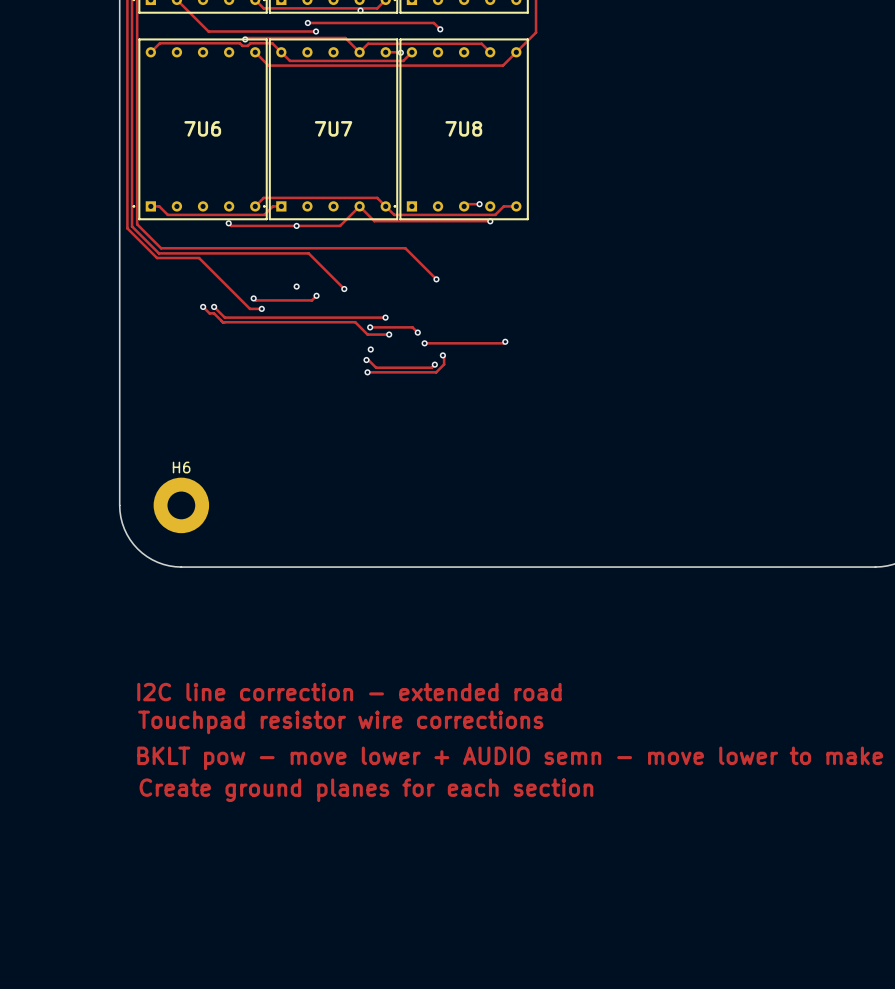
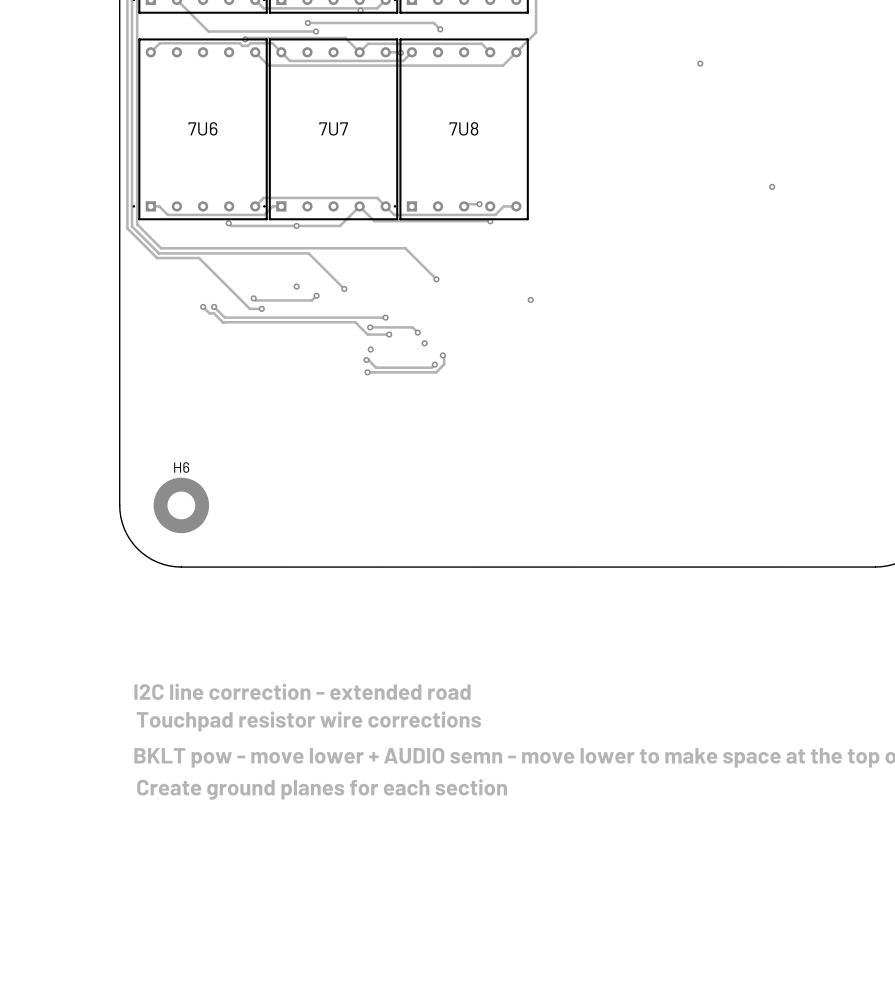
via: none -> (700, 63)
via: none -> (772, 186)
track: (505, 341) (503, 343) (424, 343) -> none
via position: (505, 341) -> (530, 299)

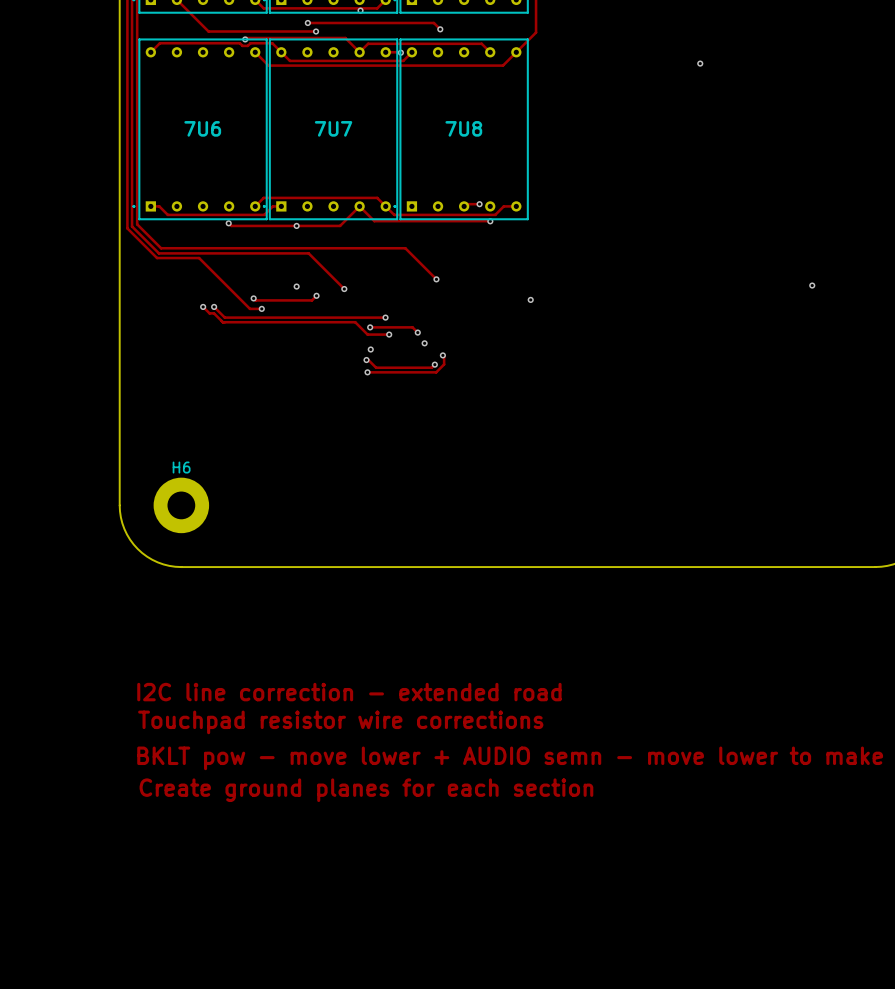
via: (772, 186) -> none
via: none -> (812, 285)

